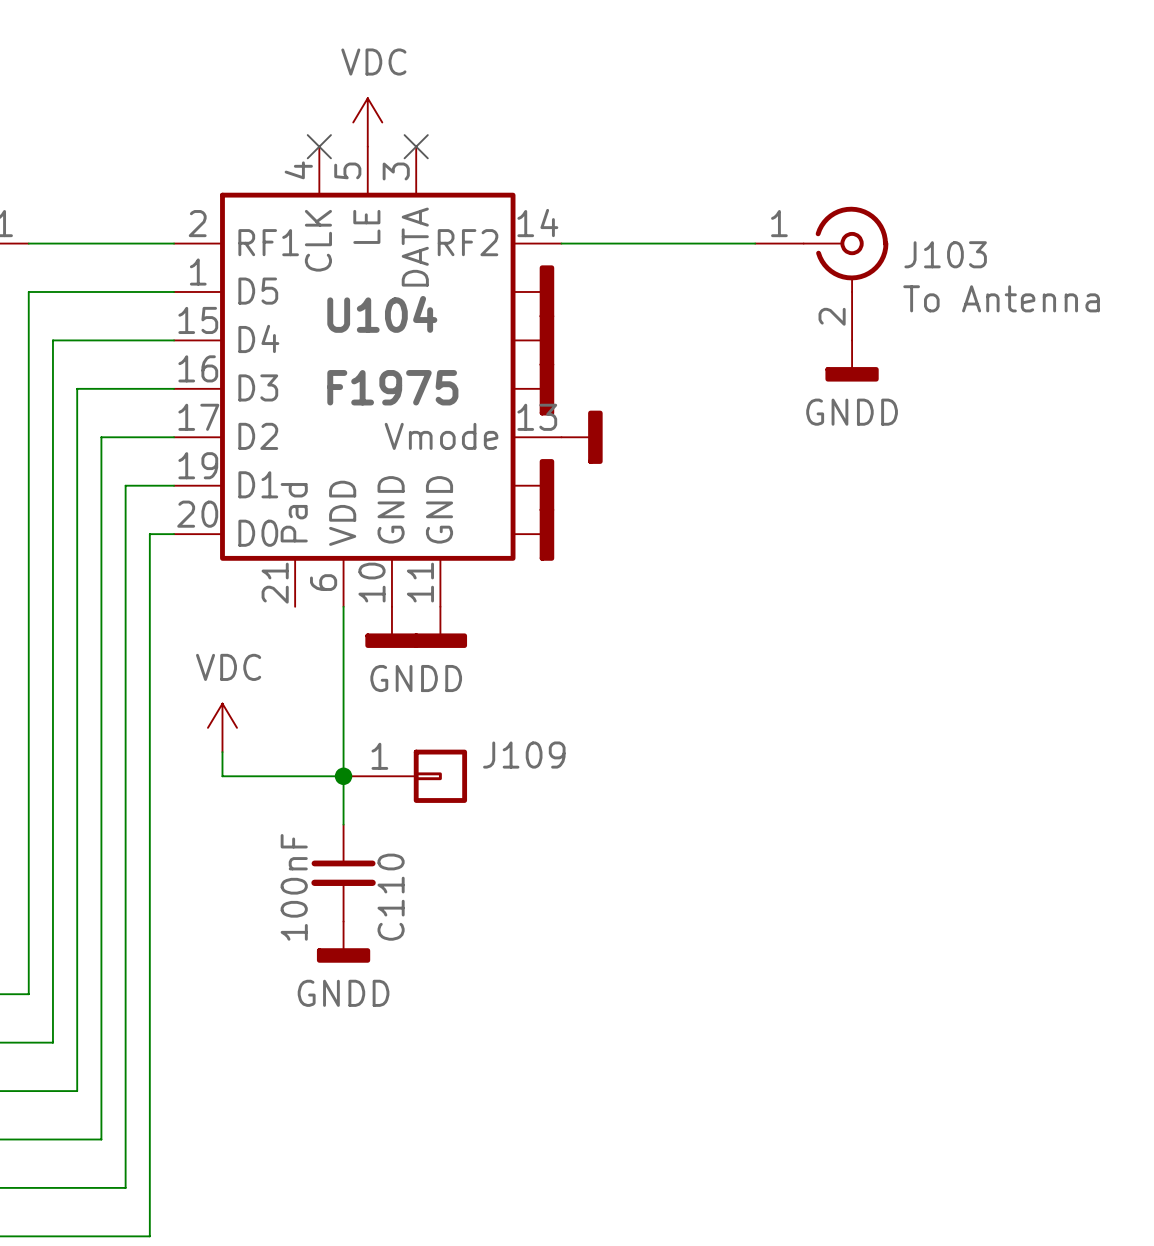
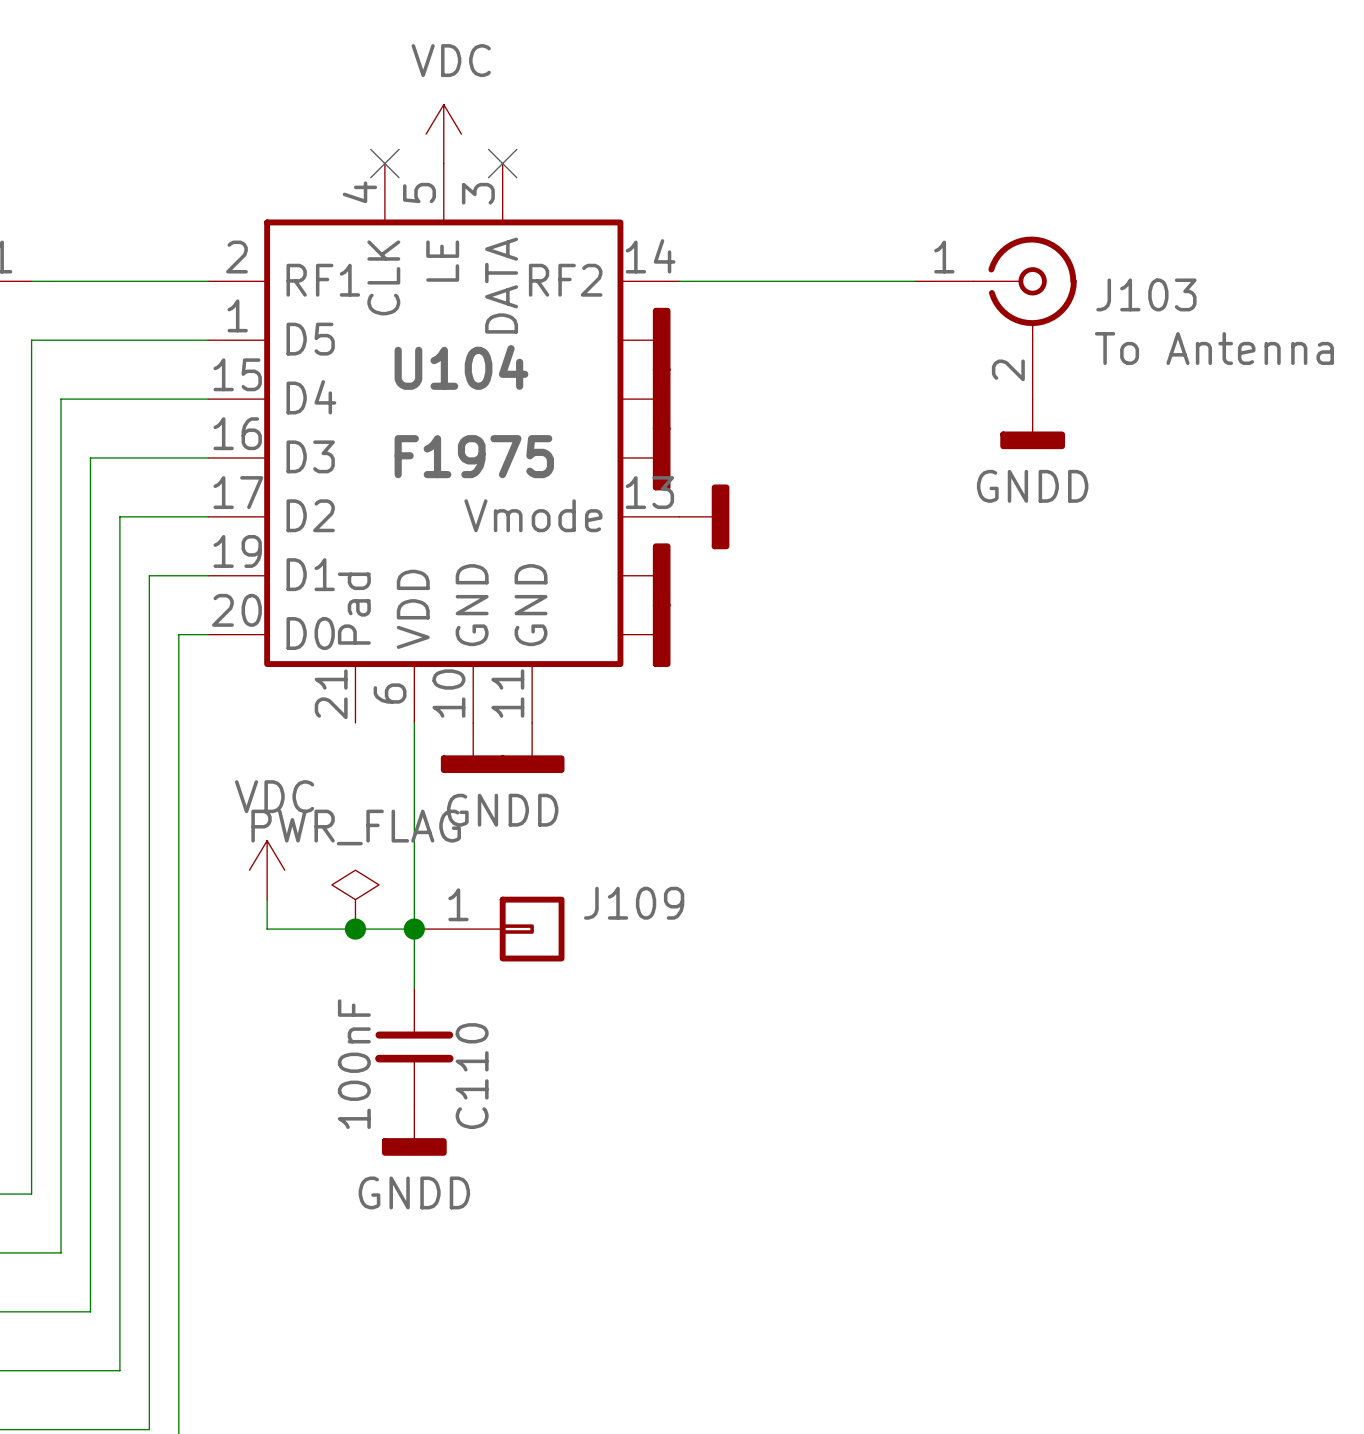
power symbol: none -> PWR_FLAG (355, 899)
junction: none -> (355, 929)

